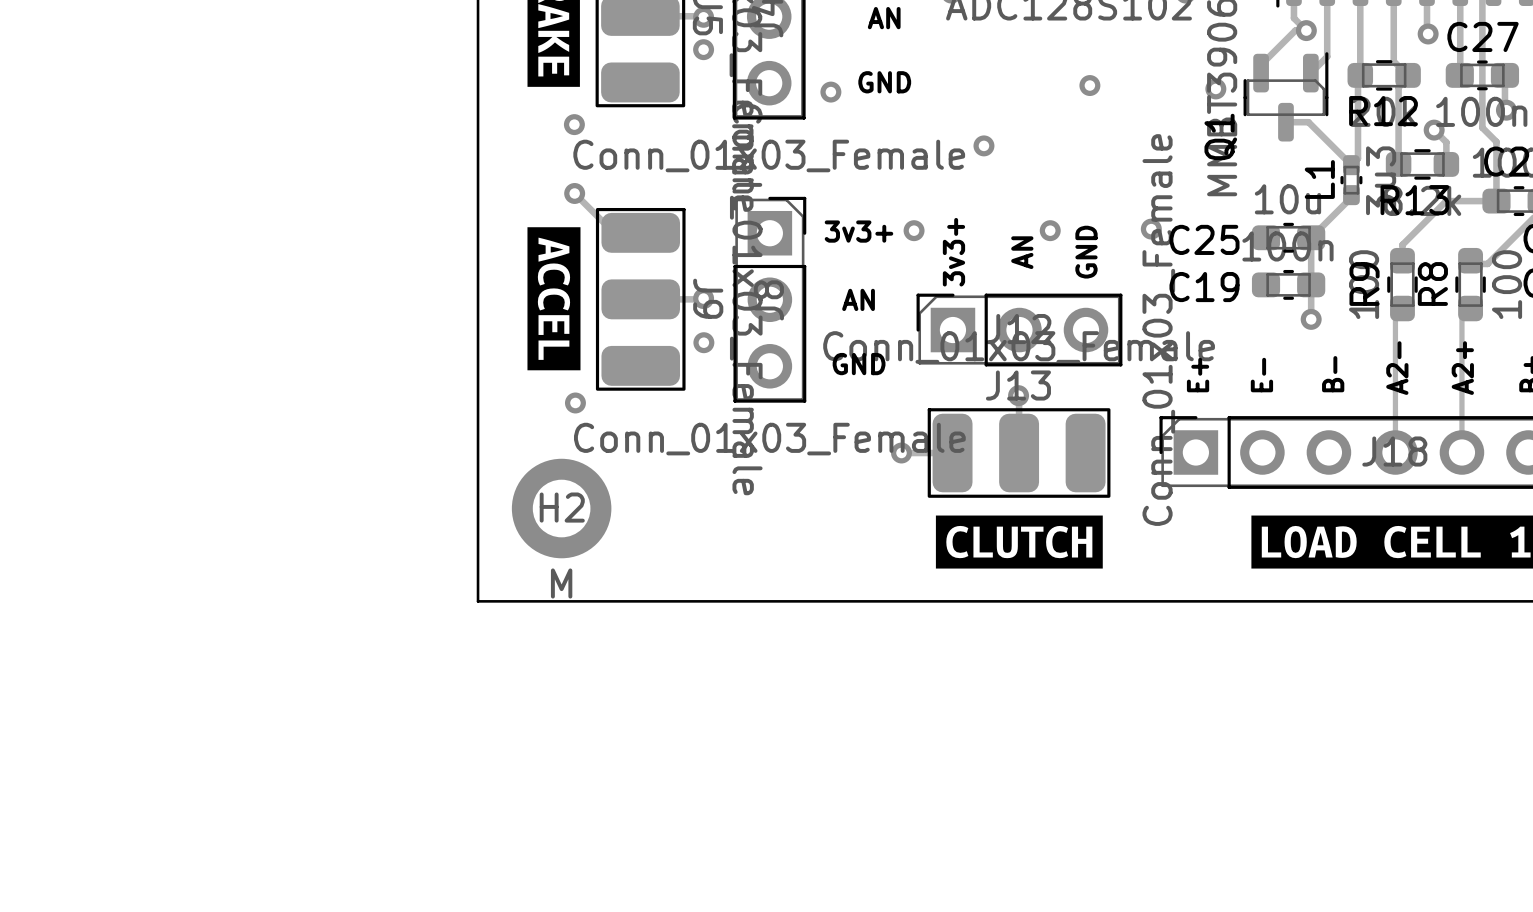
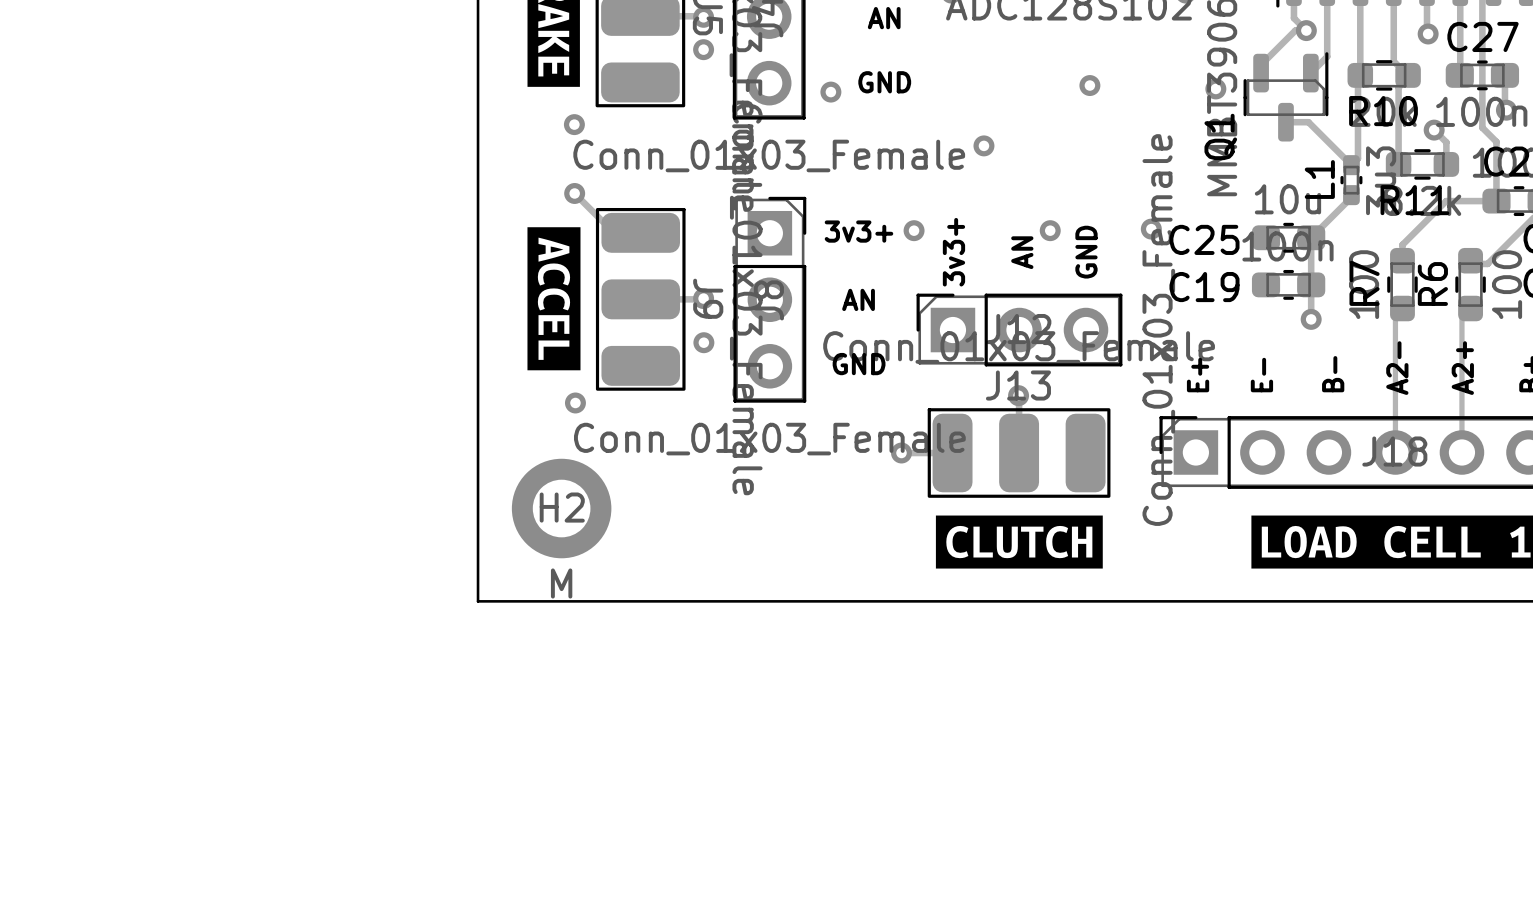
R12 name: R12 (1383, 111) -> R10 (1383, 111)
R13 name: R13 (1414, 200) -> R11 (1414, 200)
R9 name: R9 (1364, 283) -> R7 (1364, 283)
R8 name: R8 (1432, 283) -> R6 (1432, 283)

